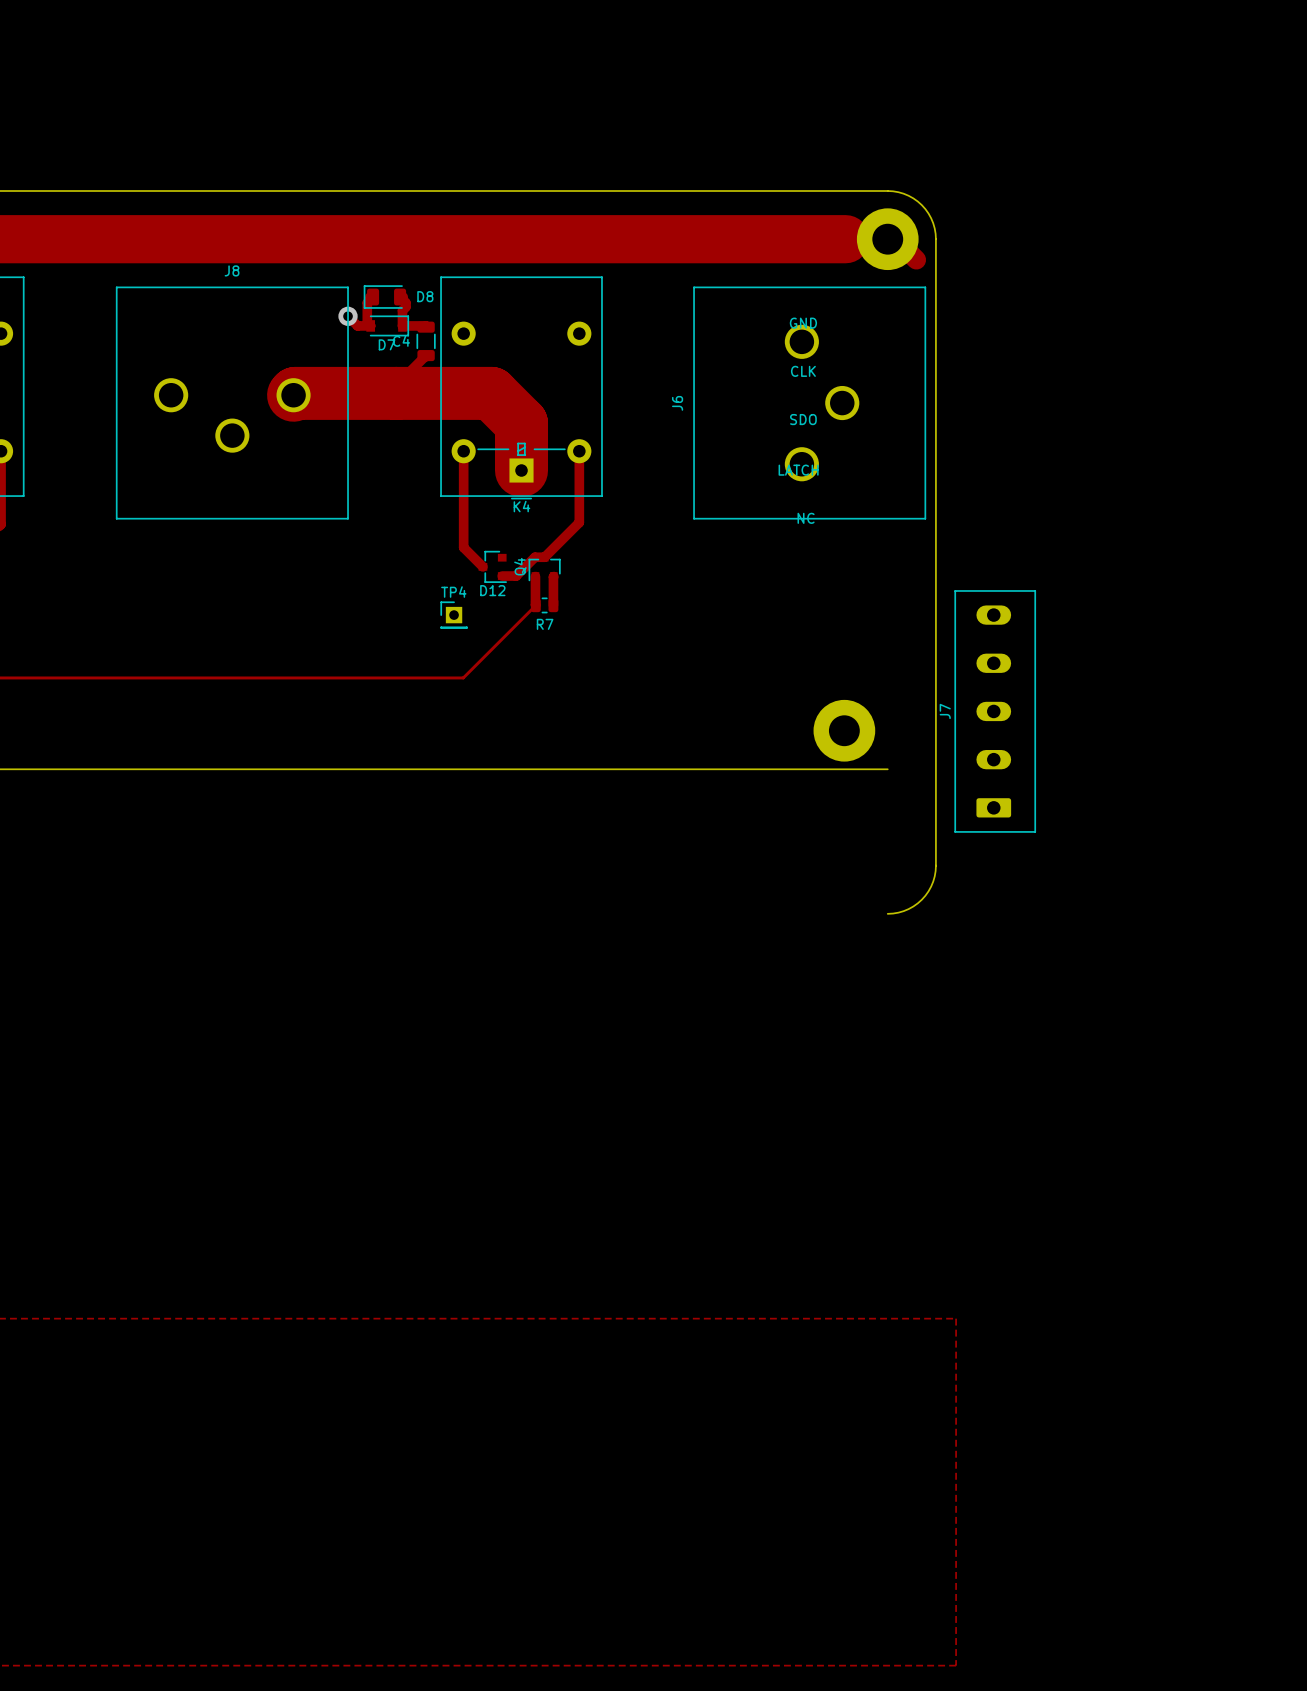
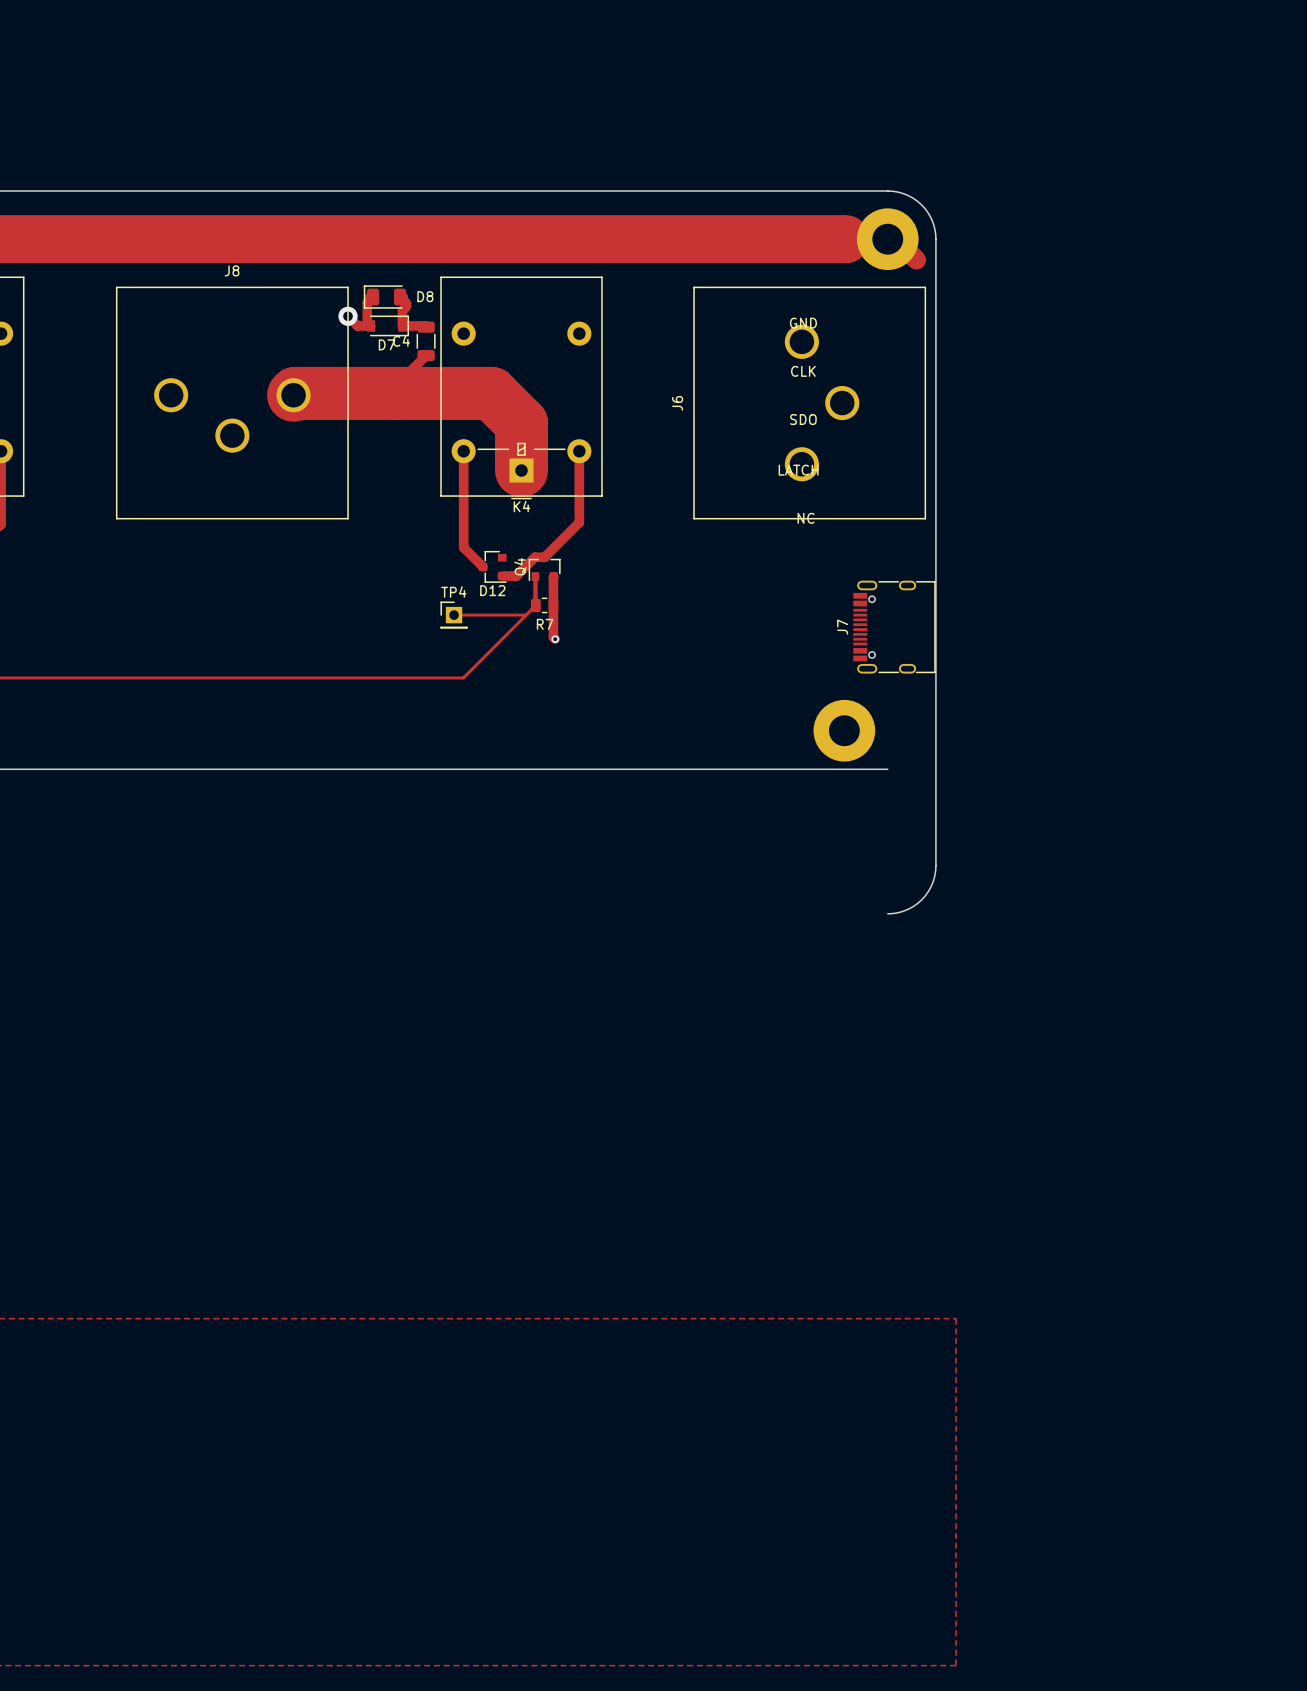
track width: thick (535, 576) (535, 605) -> thin (535, 576) (535, 605)
J7 footprint: [954, 590, 1036, 833] -> [853, 580, 936, 674]
track: none -> (553, 605) (553, 637) (555, 639)
track: none -> (454, 615) (526, 615)
via: none -> (555, 639)

